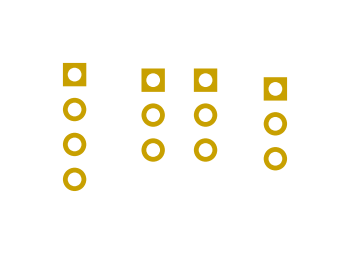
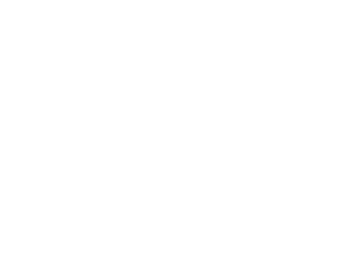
part: (153, 115) -> none
part: (205, 115) -> none
part: (275, 123) -> none
part: (74, 126) -> none

